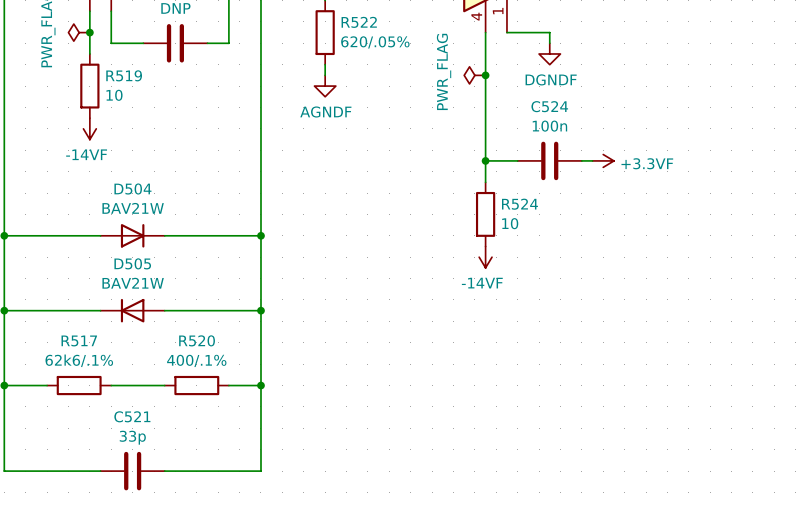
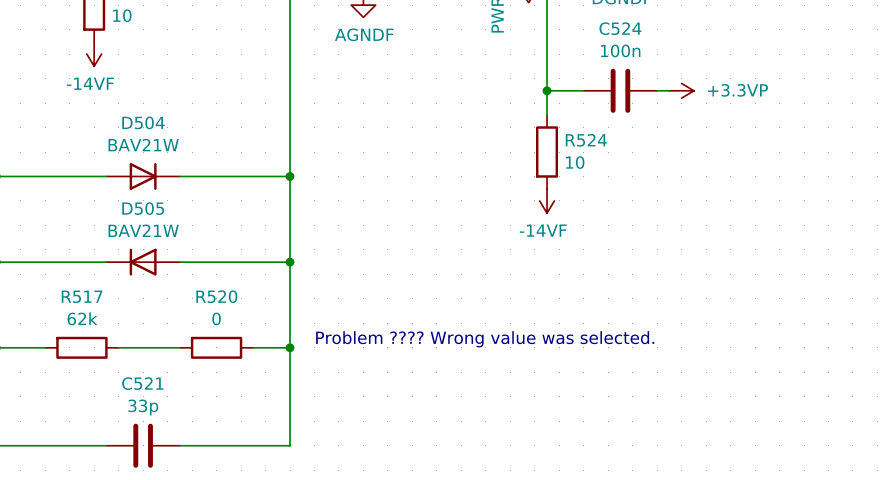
power symbol: +3.3VF (603, 160) -> +3.3VP (681, 90)
R517 value: 62k6/.1% (79, 360) -> 62k (82, 318)
R520 value: 400/.1% (196, 360) -> 0 (216, 318)
text: none -> Problem ???? Wrong value was selected. (485, 339)

